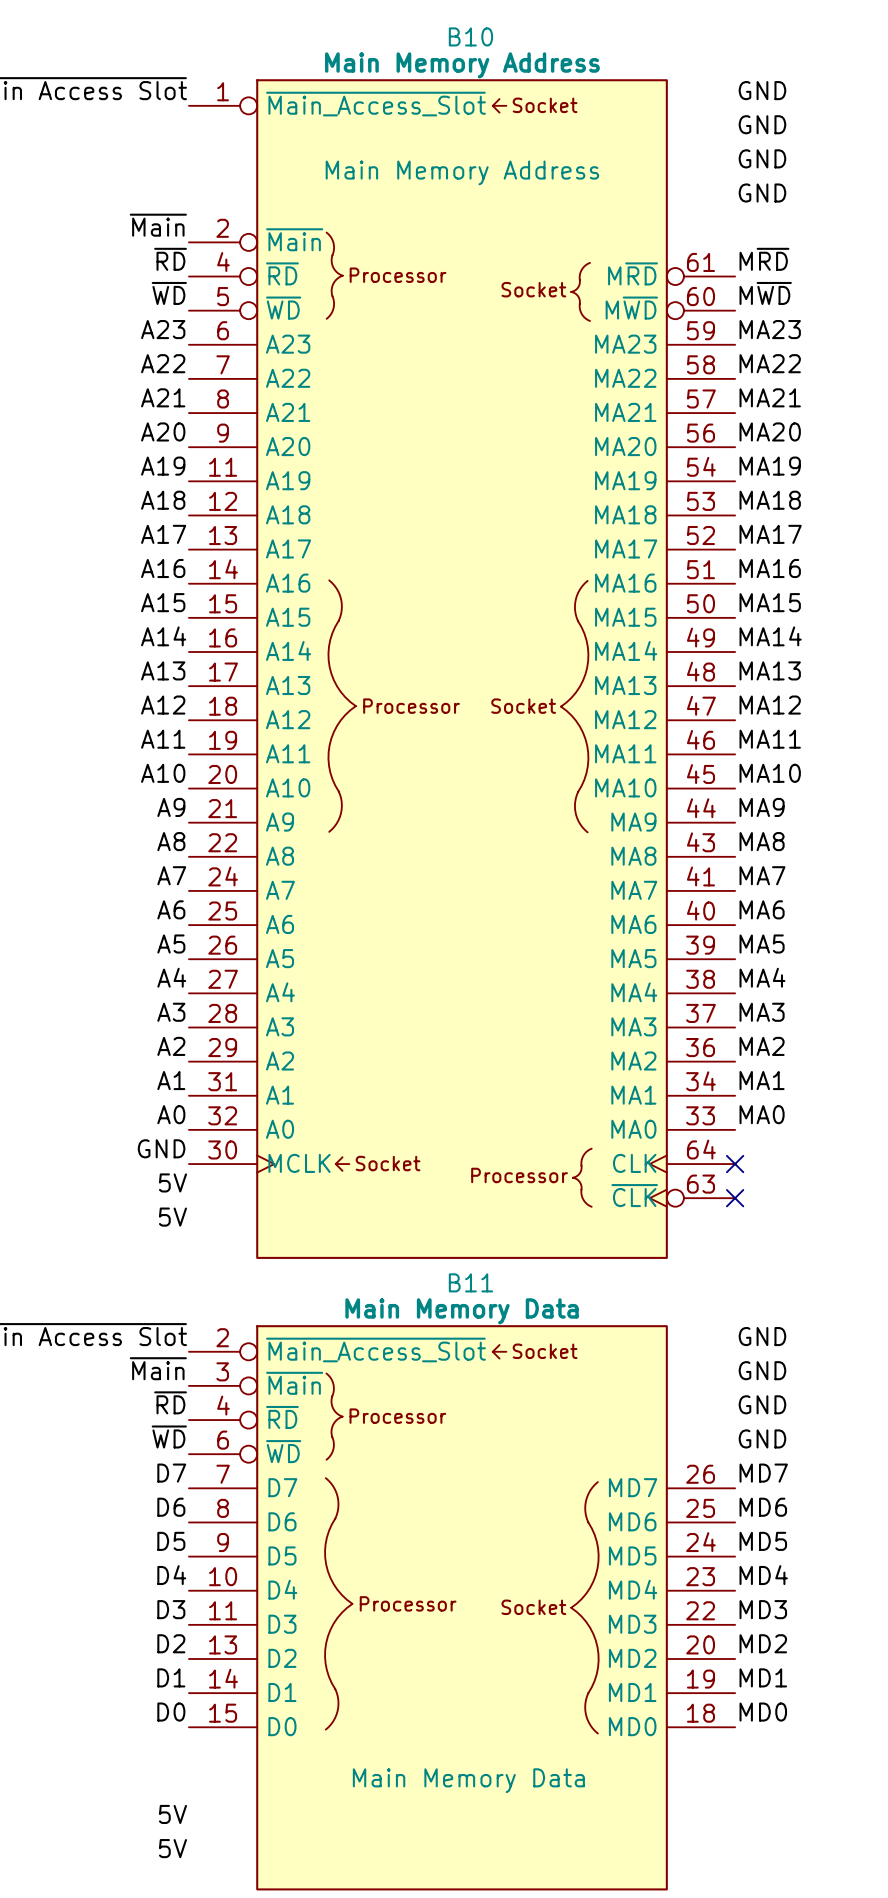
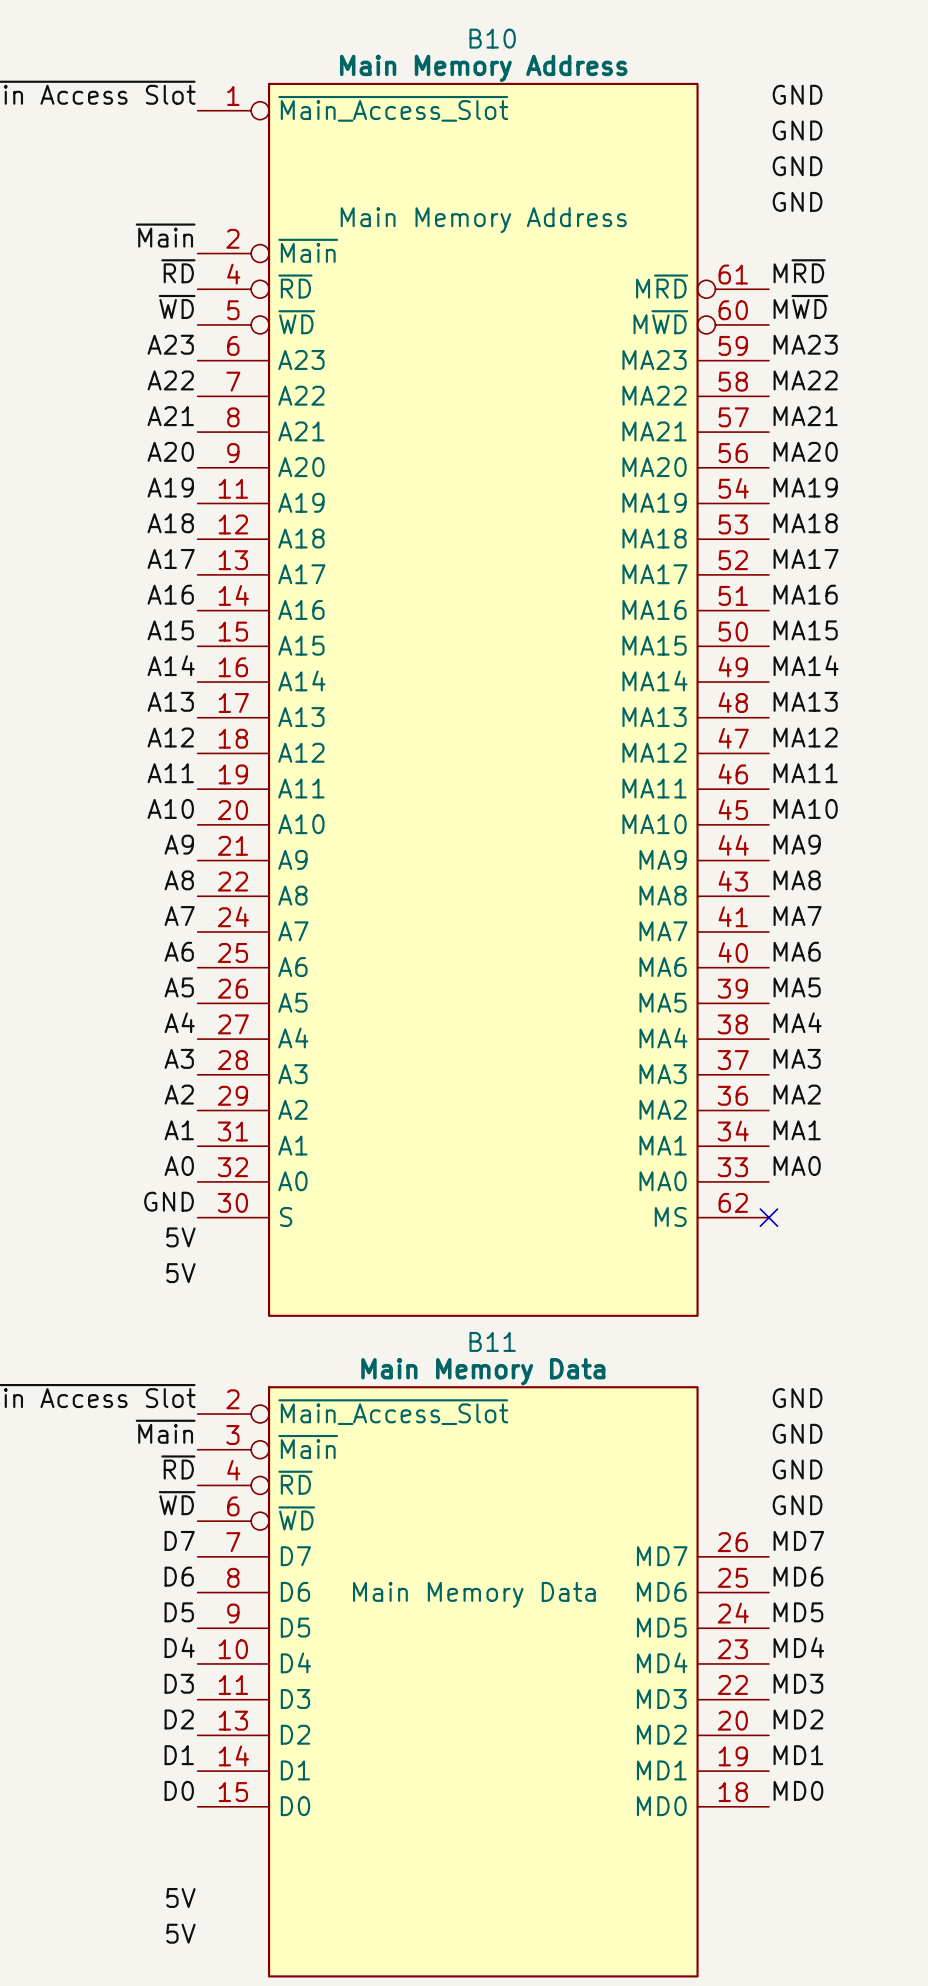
B10 symbol: [188, 79, 736, 1259] -> [197, 82, 769, 1317]
B10 text position: Main Memory Address (462, 172) -> Main Memory Address (483, 220)
no-connect mark: (735, 1198) -> none
B11 symbol: [188, 1325, 736, 1891] -> [197, 1386, 769, 1978]
B11 text position: Main Memory Data (468, 1780) -> Main Memory Data (474, 1594)

